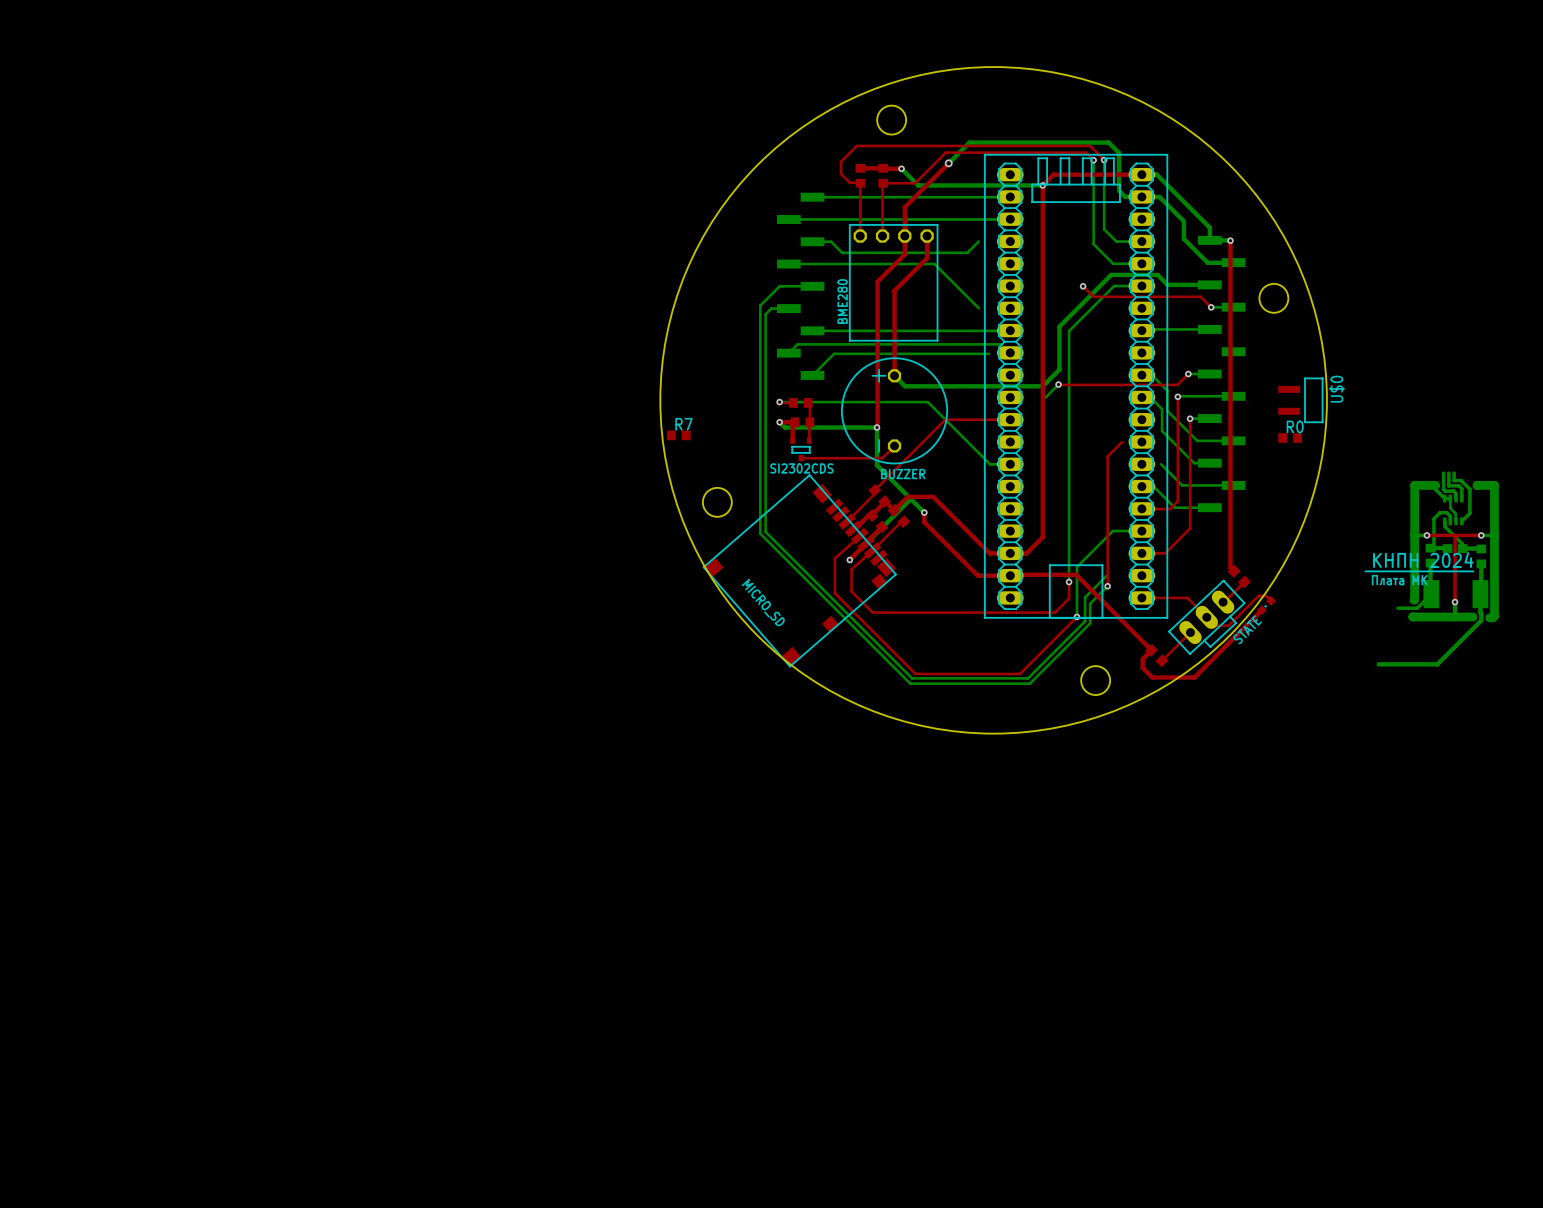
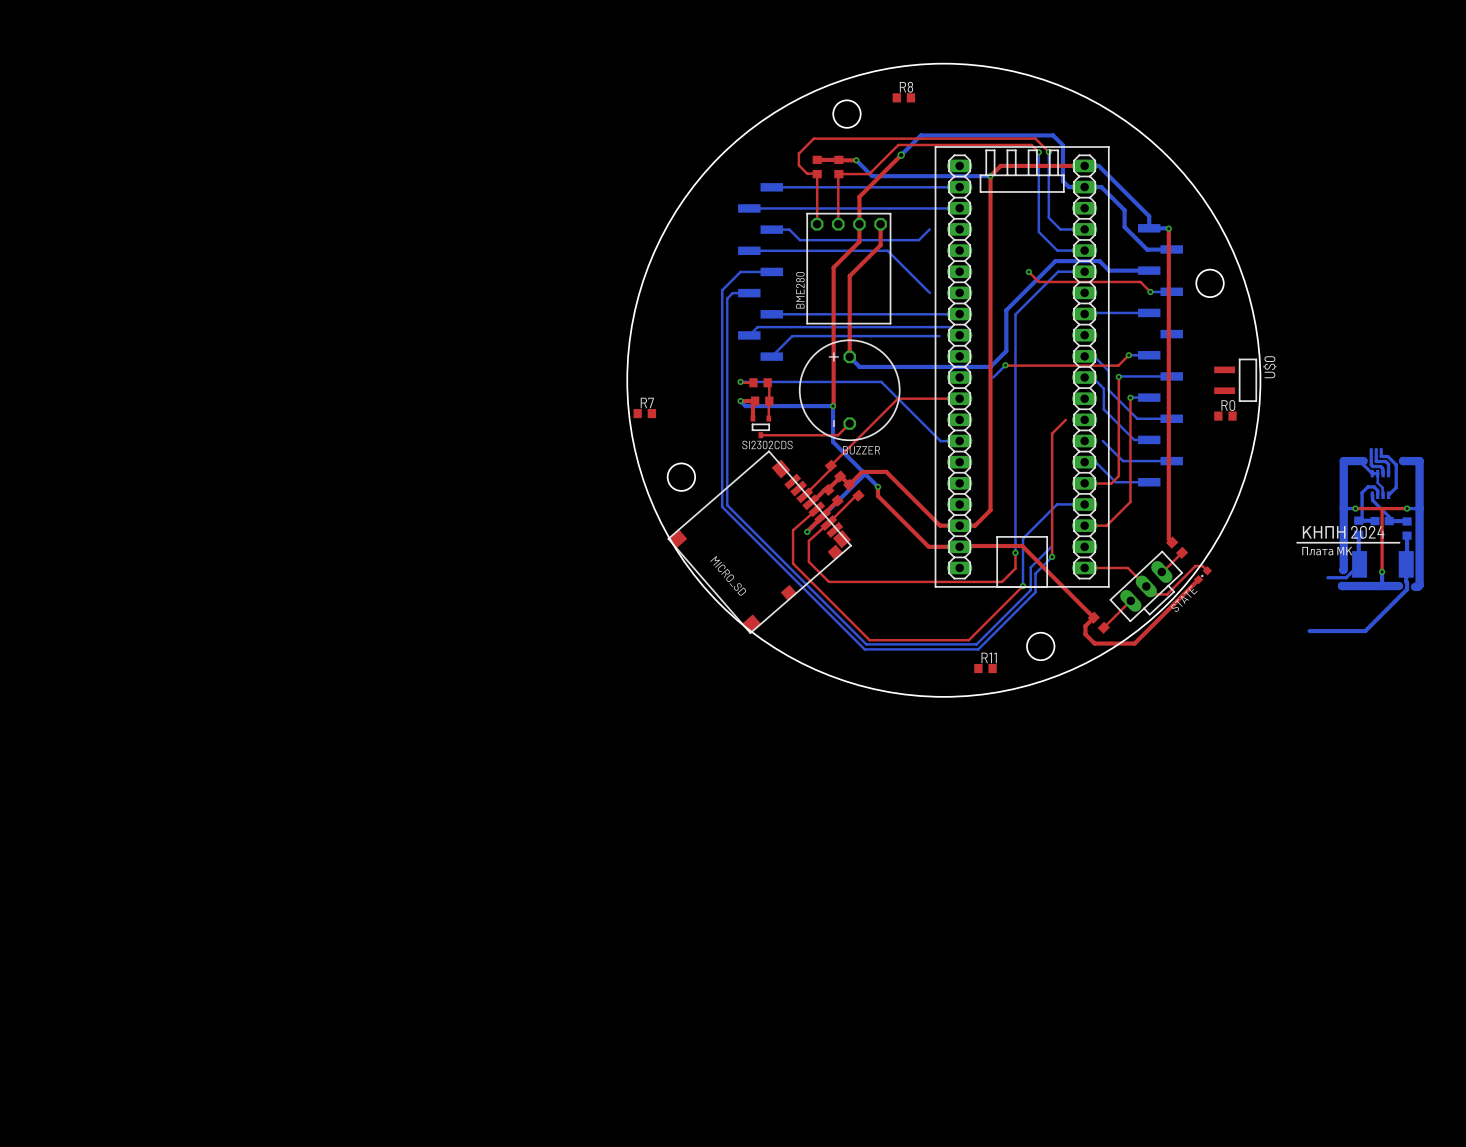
R8: none -> (903, 97)
R11: none -> (985, 668)

